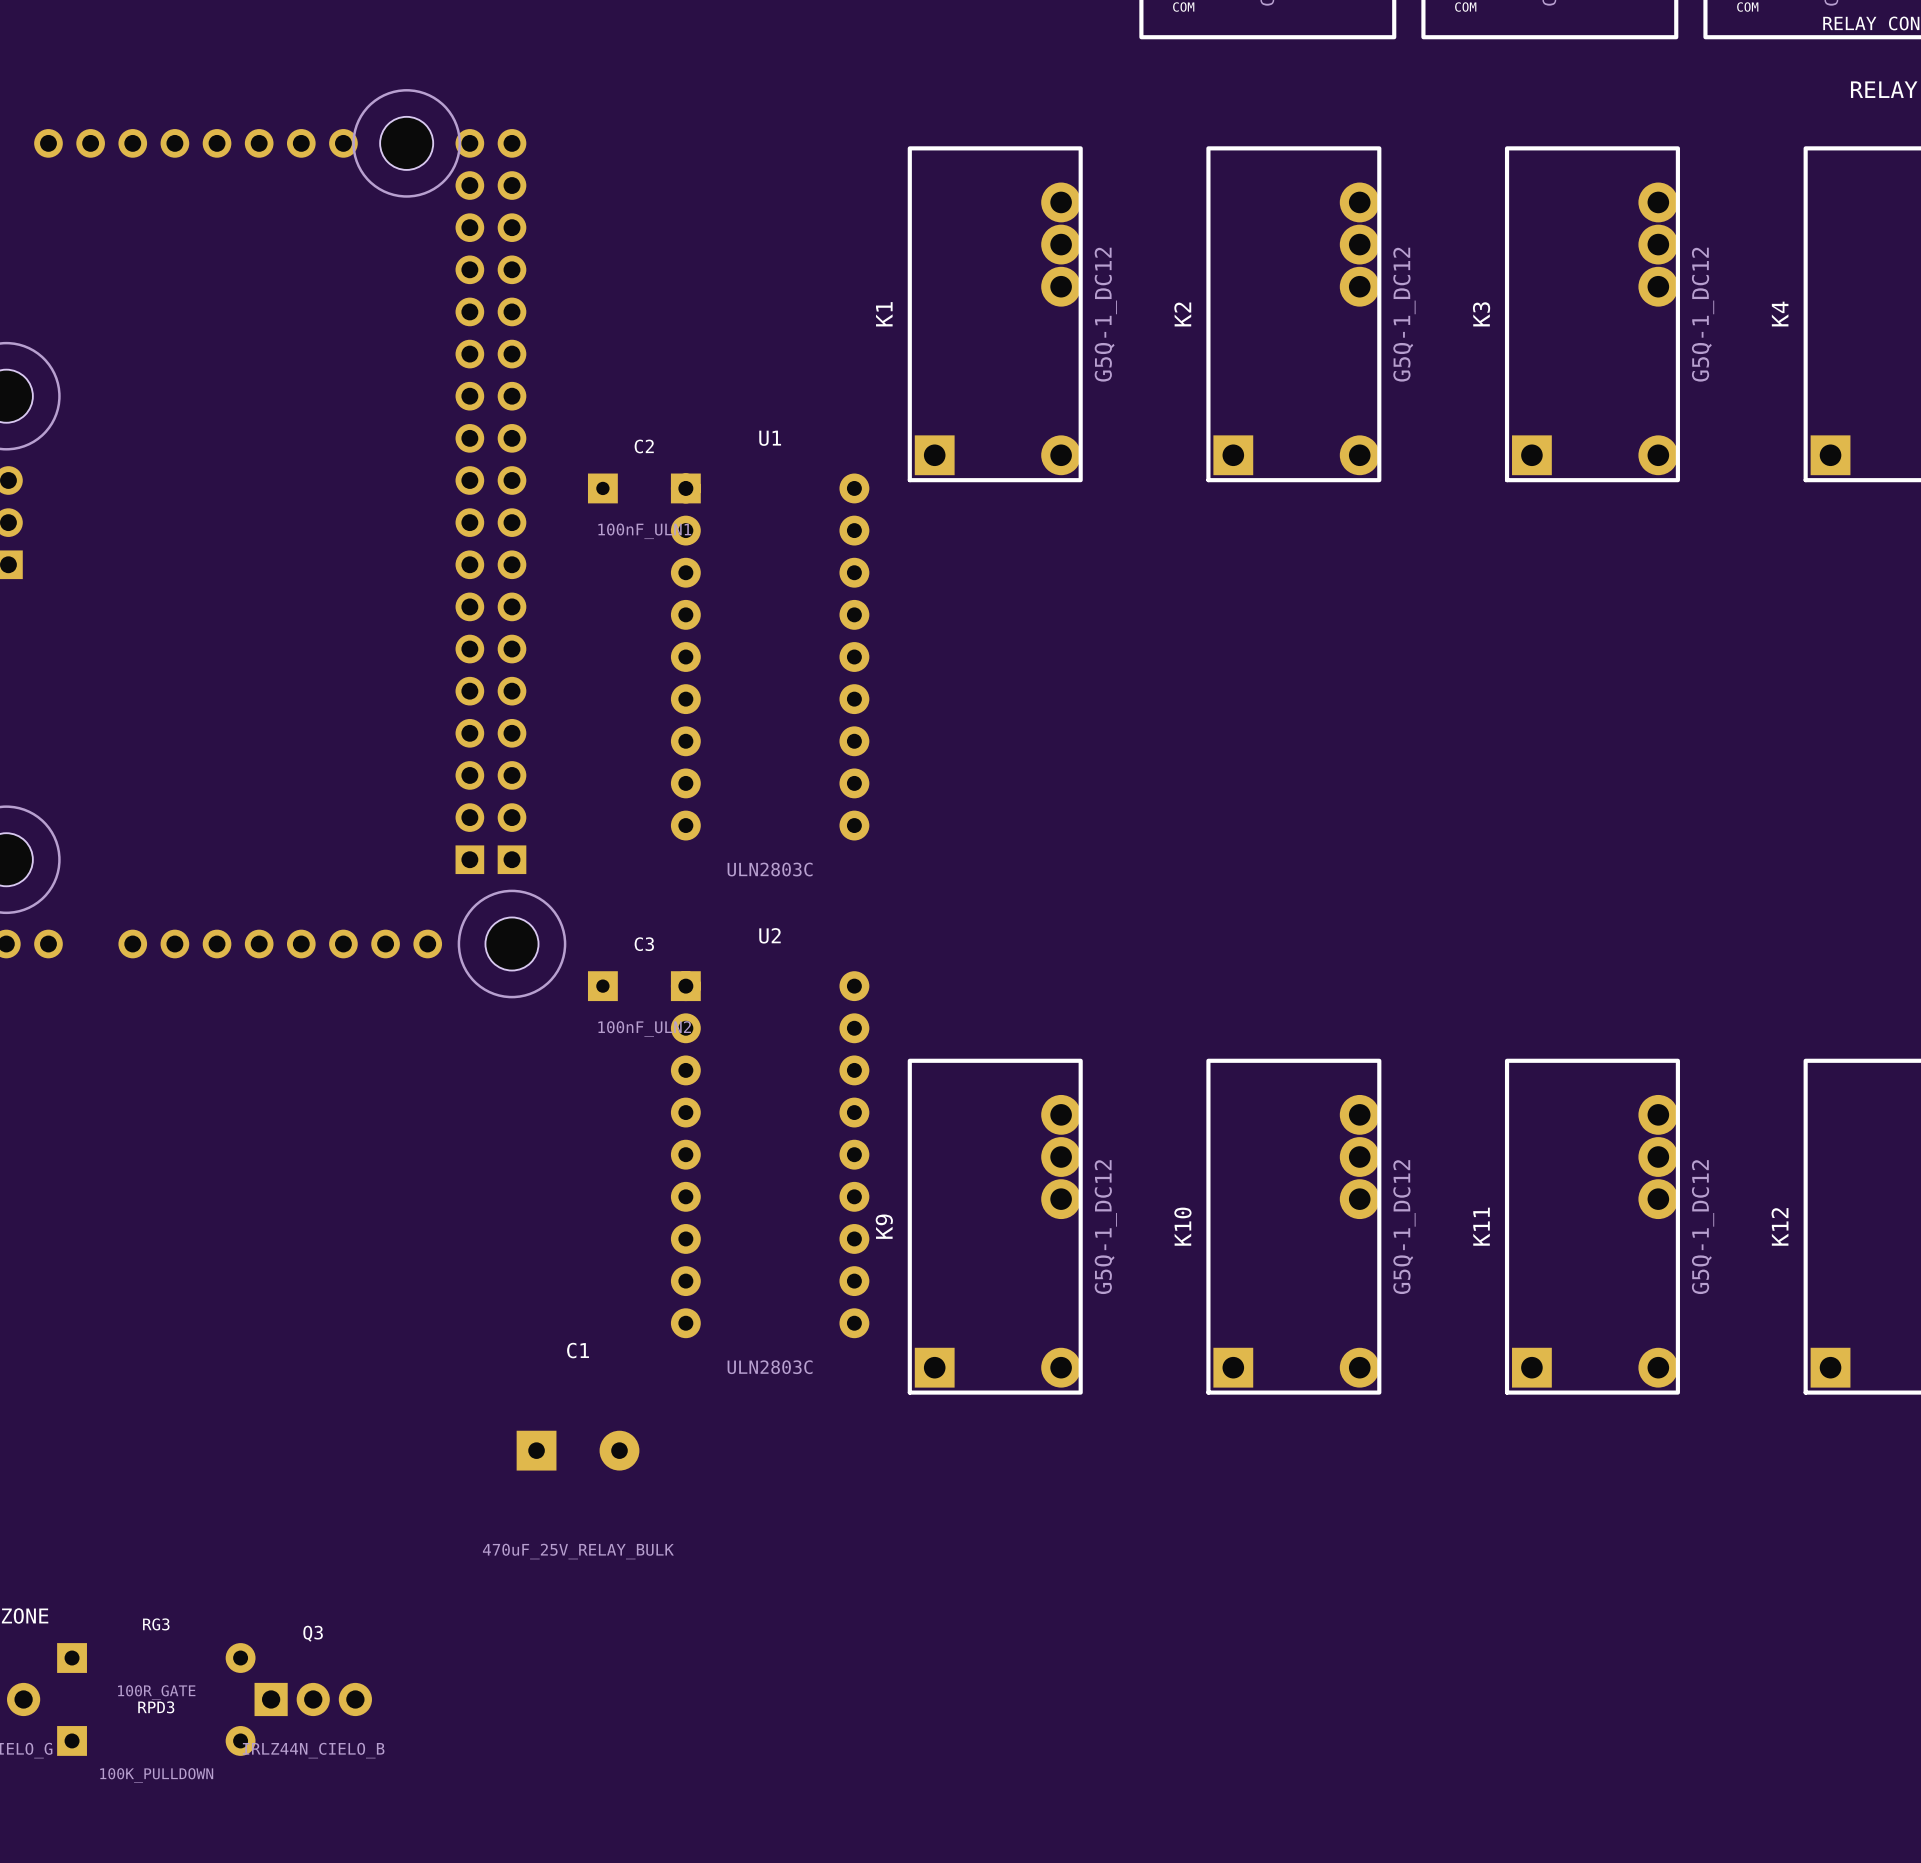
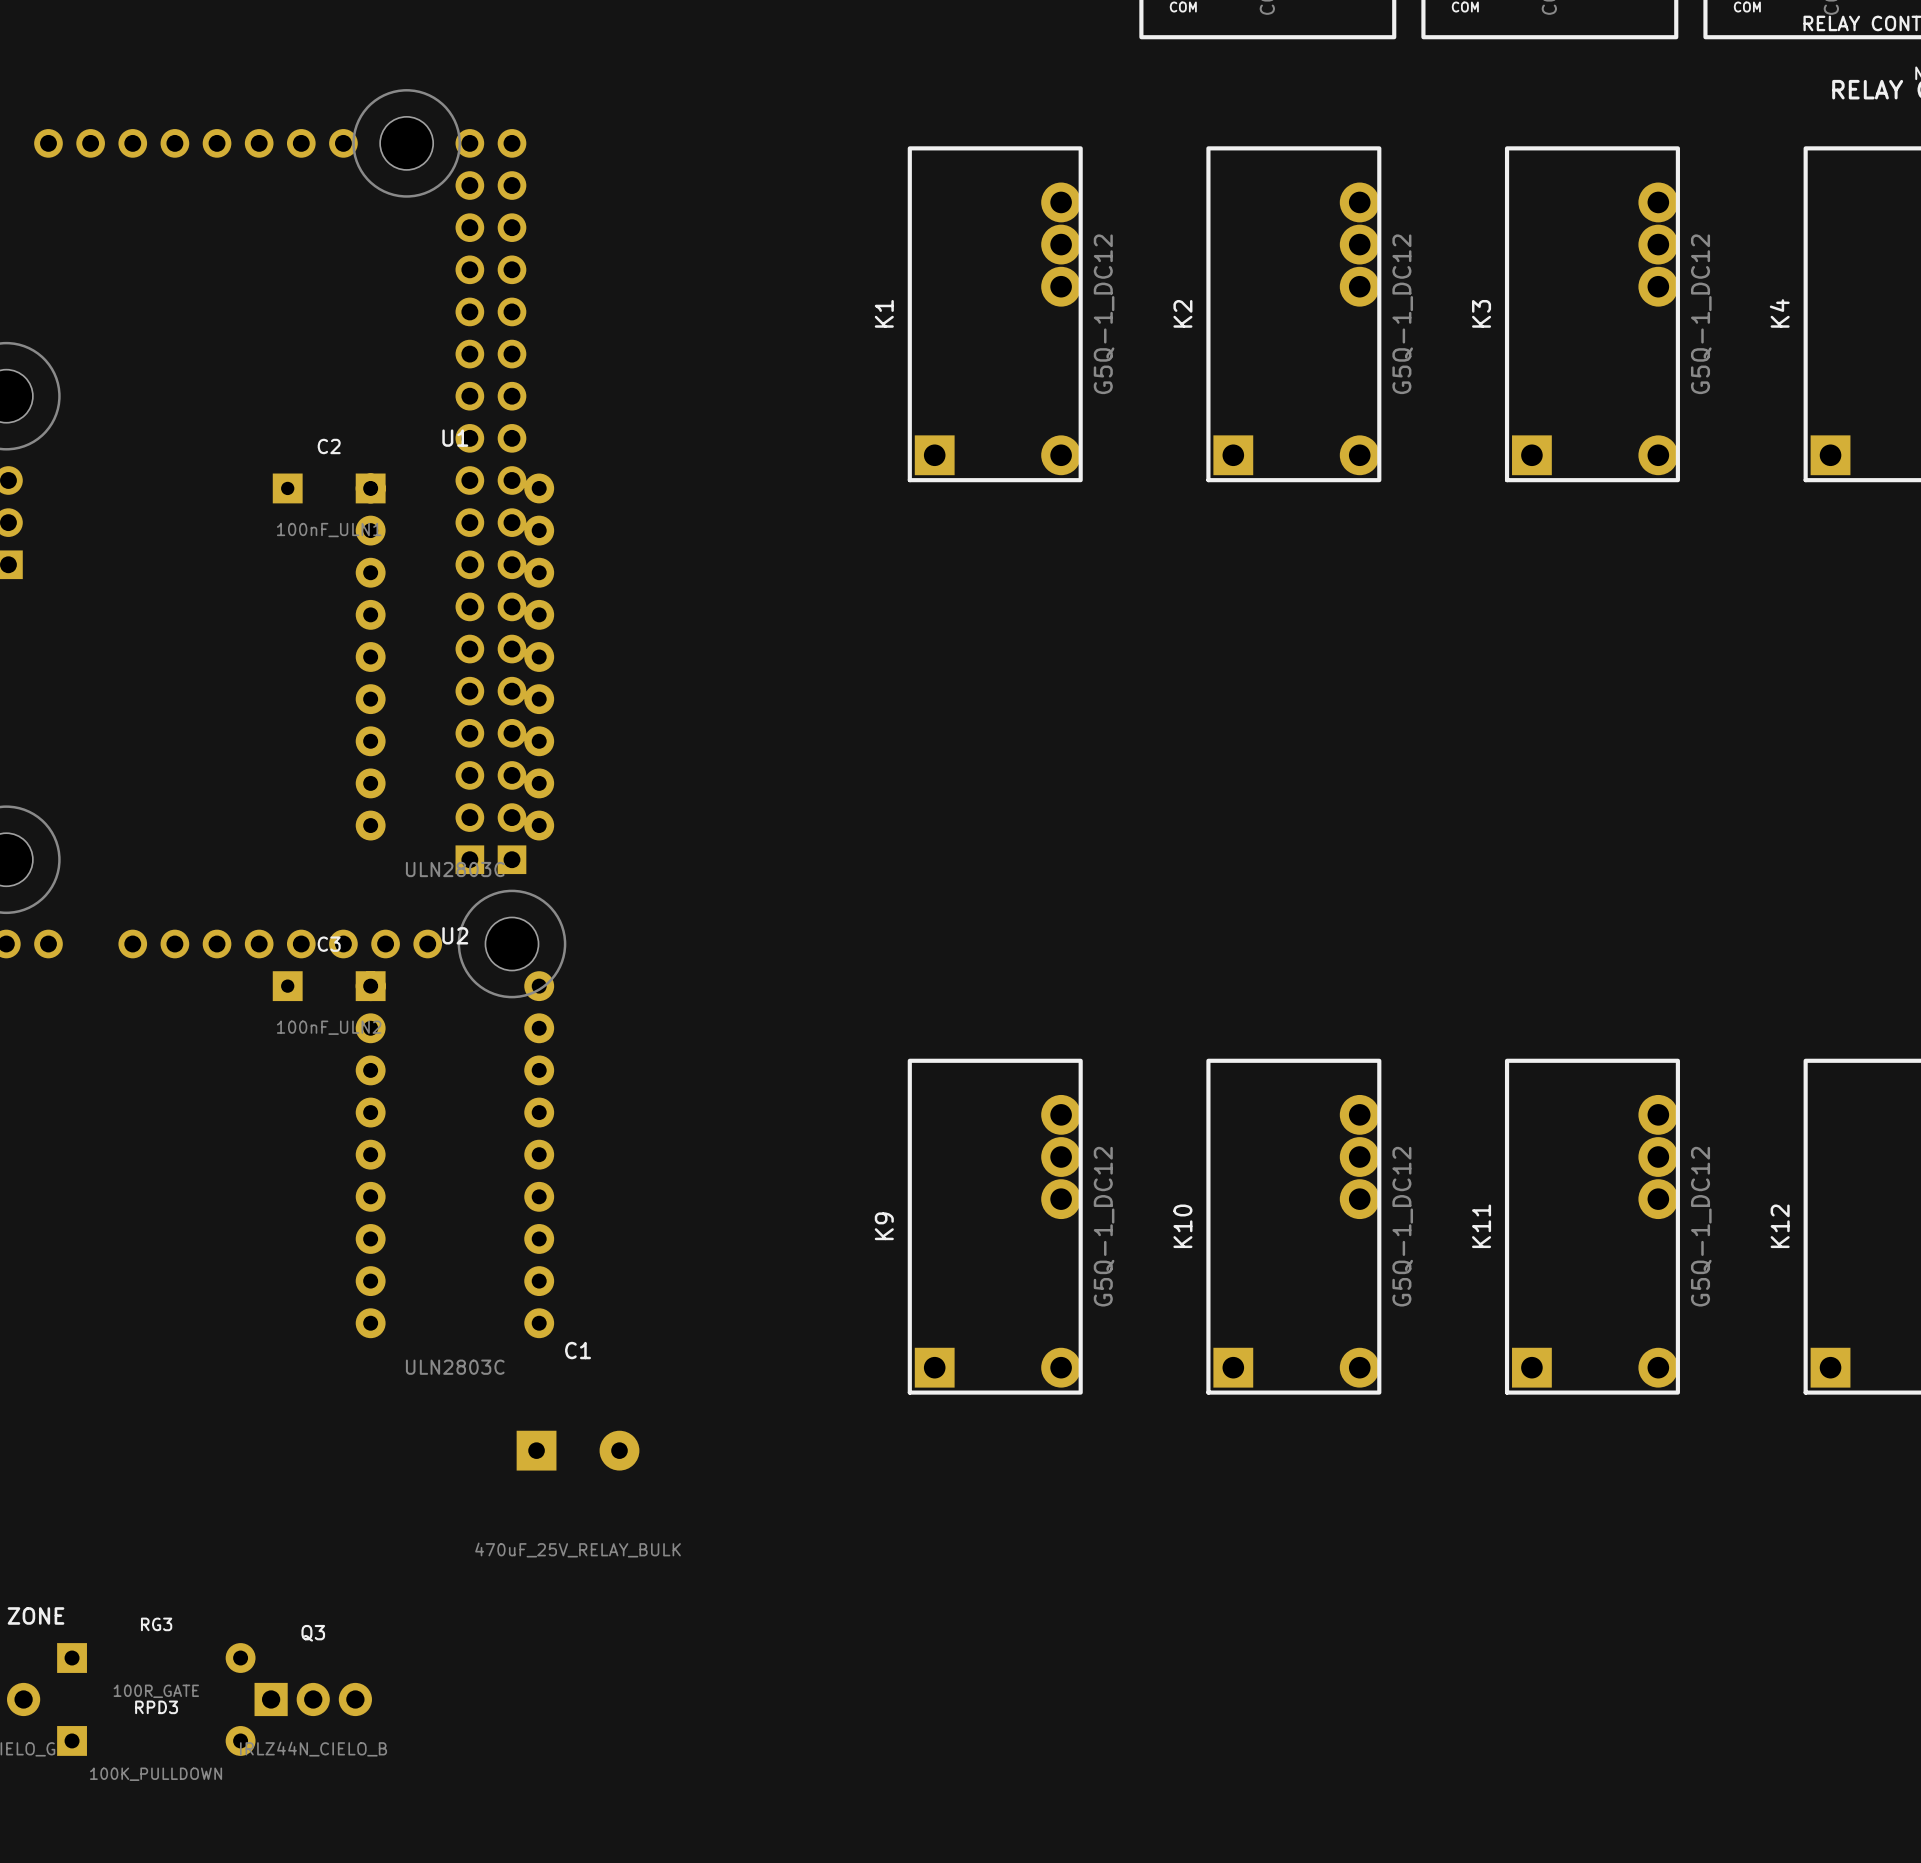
C2 position: (644, 488) -> (329, 488)
U1 position: (770, 657) -> (454, 657)
C3 position: (644, 986) -> (329, 986)
U2 position: (770, 1154) -> (454, 1154)

